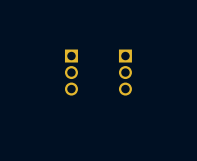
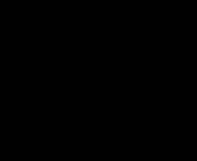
part: (71, 72) -> none
part: (125, 72) -> none

